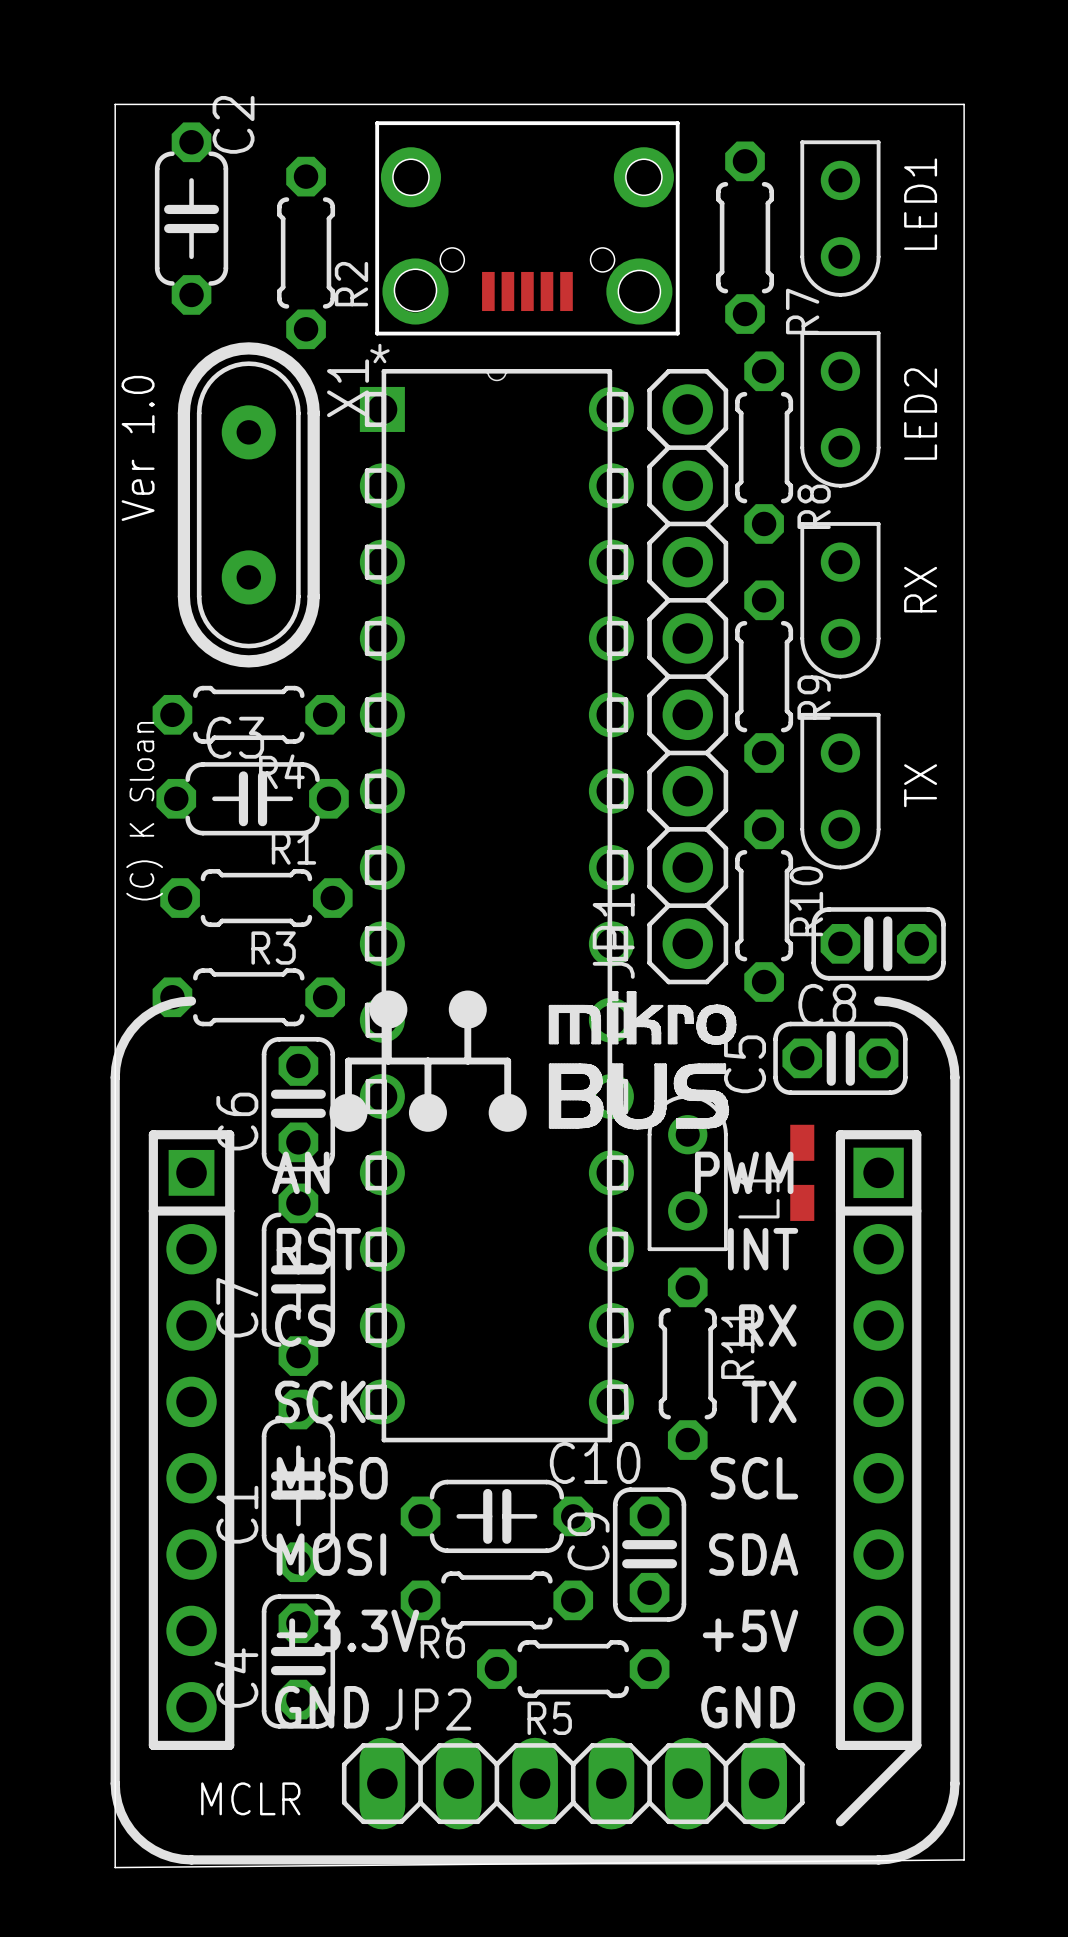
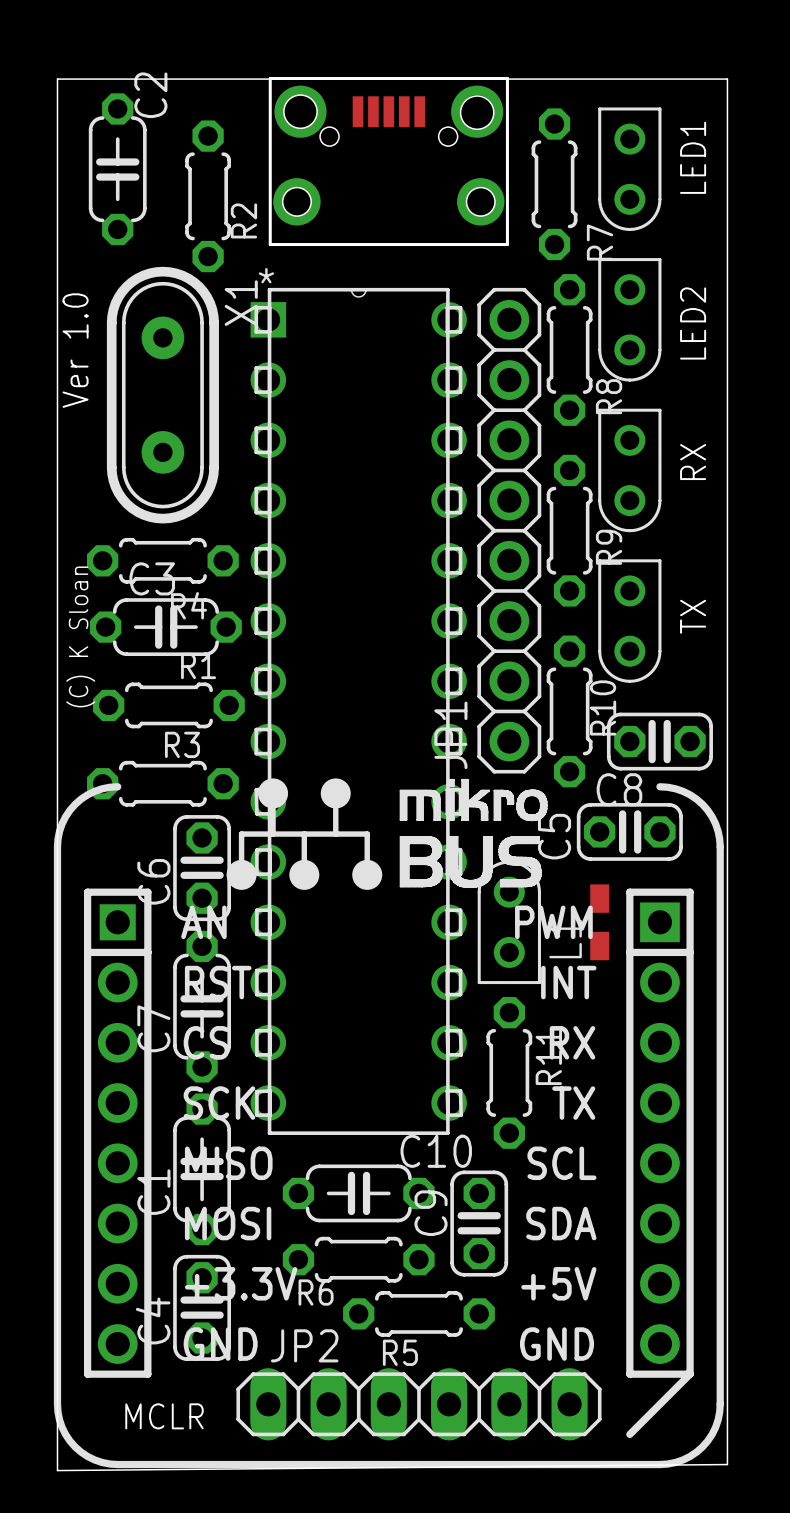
part footprint: [375, 121, 680, 336] -> [268, 76, 509, 247]

